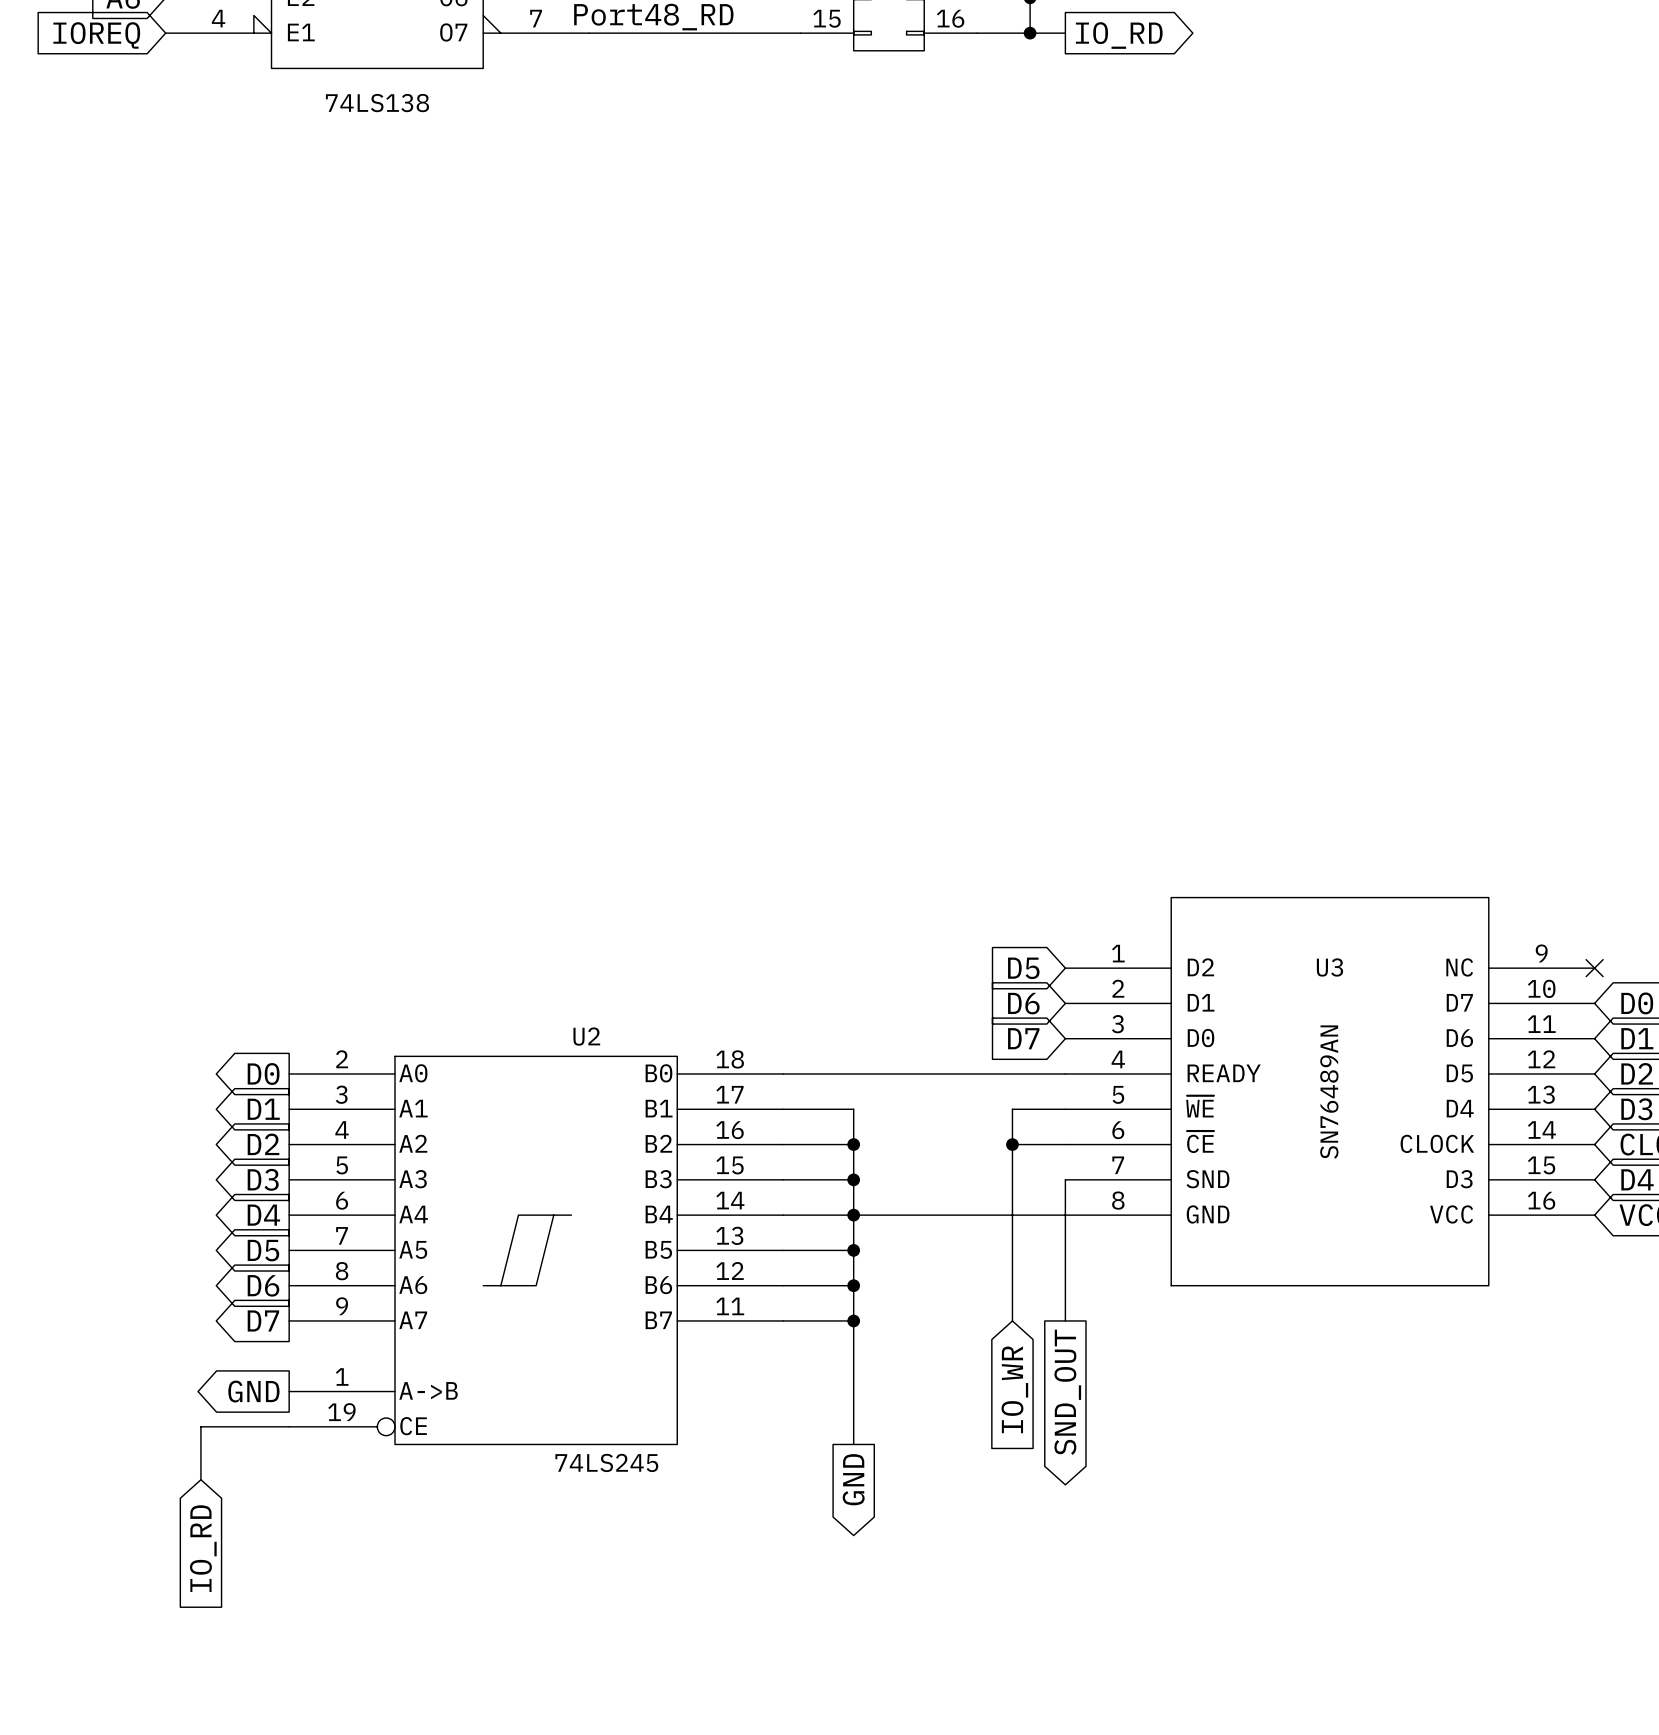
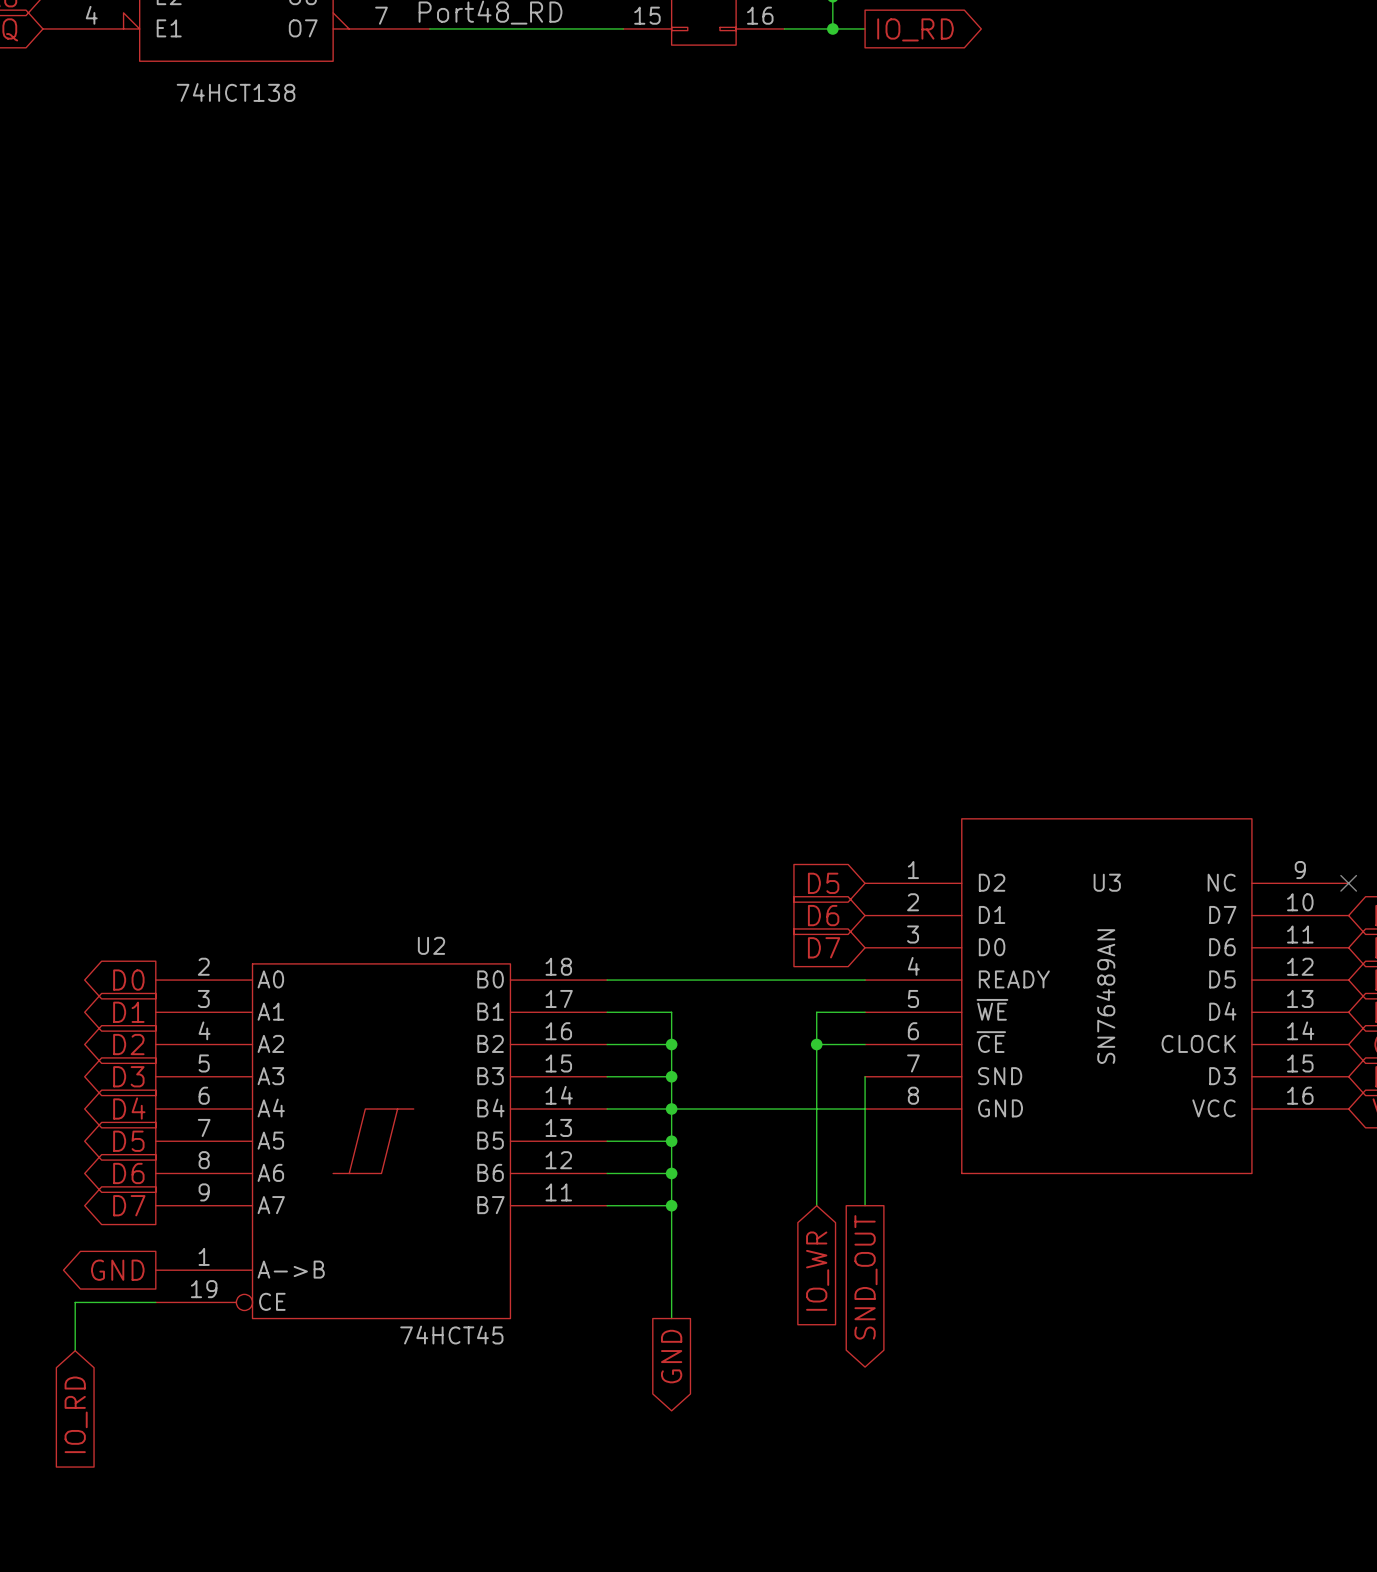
part value: 74LS138 (377, 103) -> 74HCT138 (236, 92)
U2 value: 74LS245 (606, 1462) -> 74HCT45 (451, 1335)

